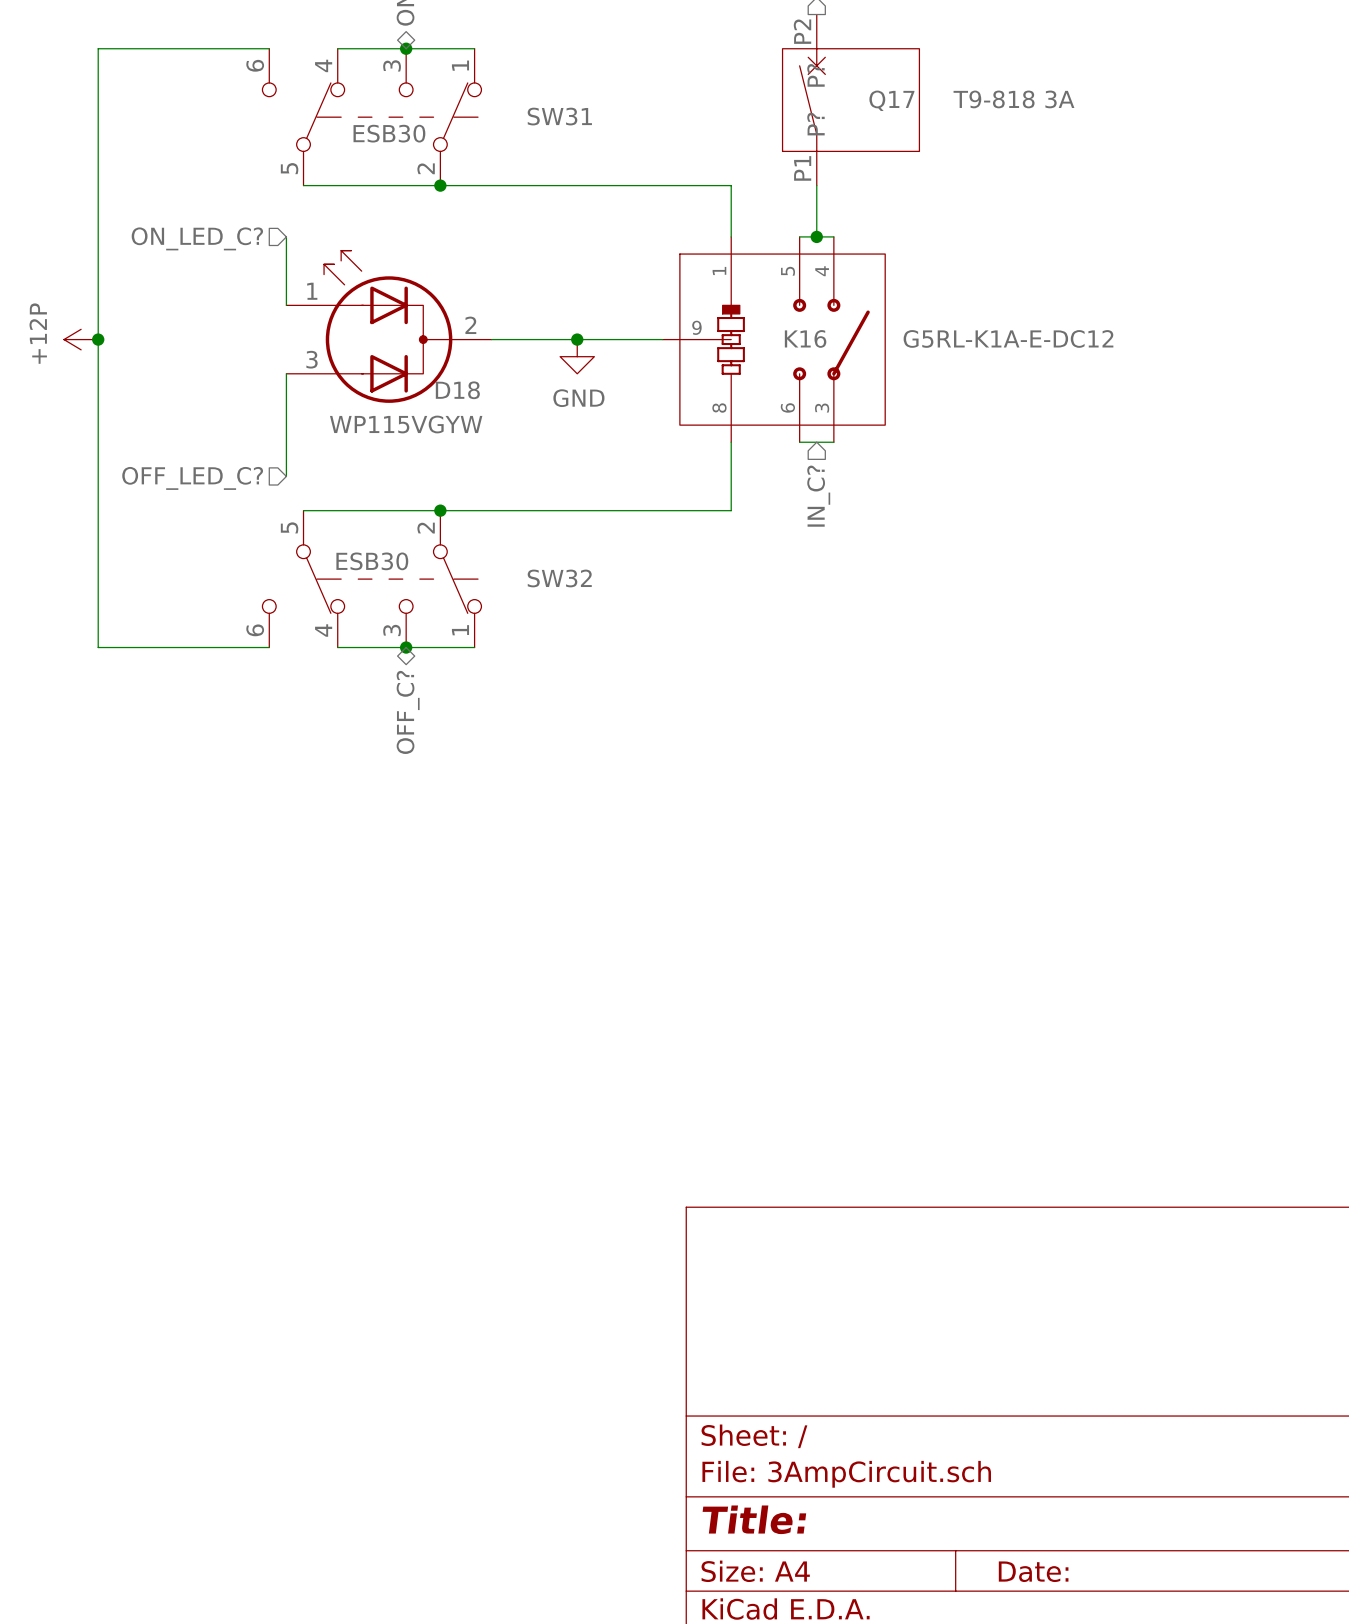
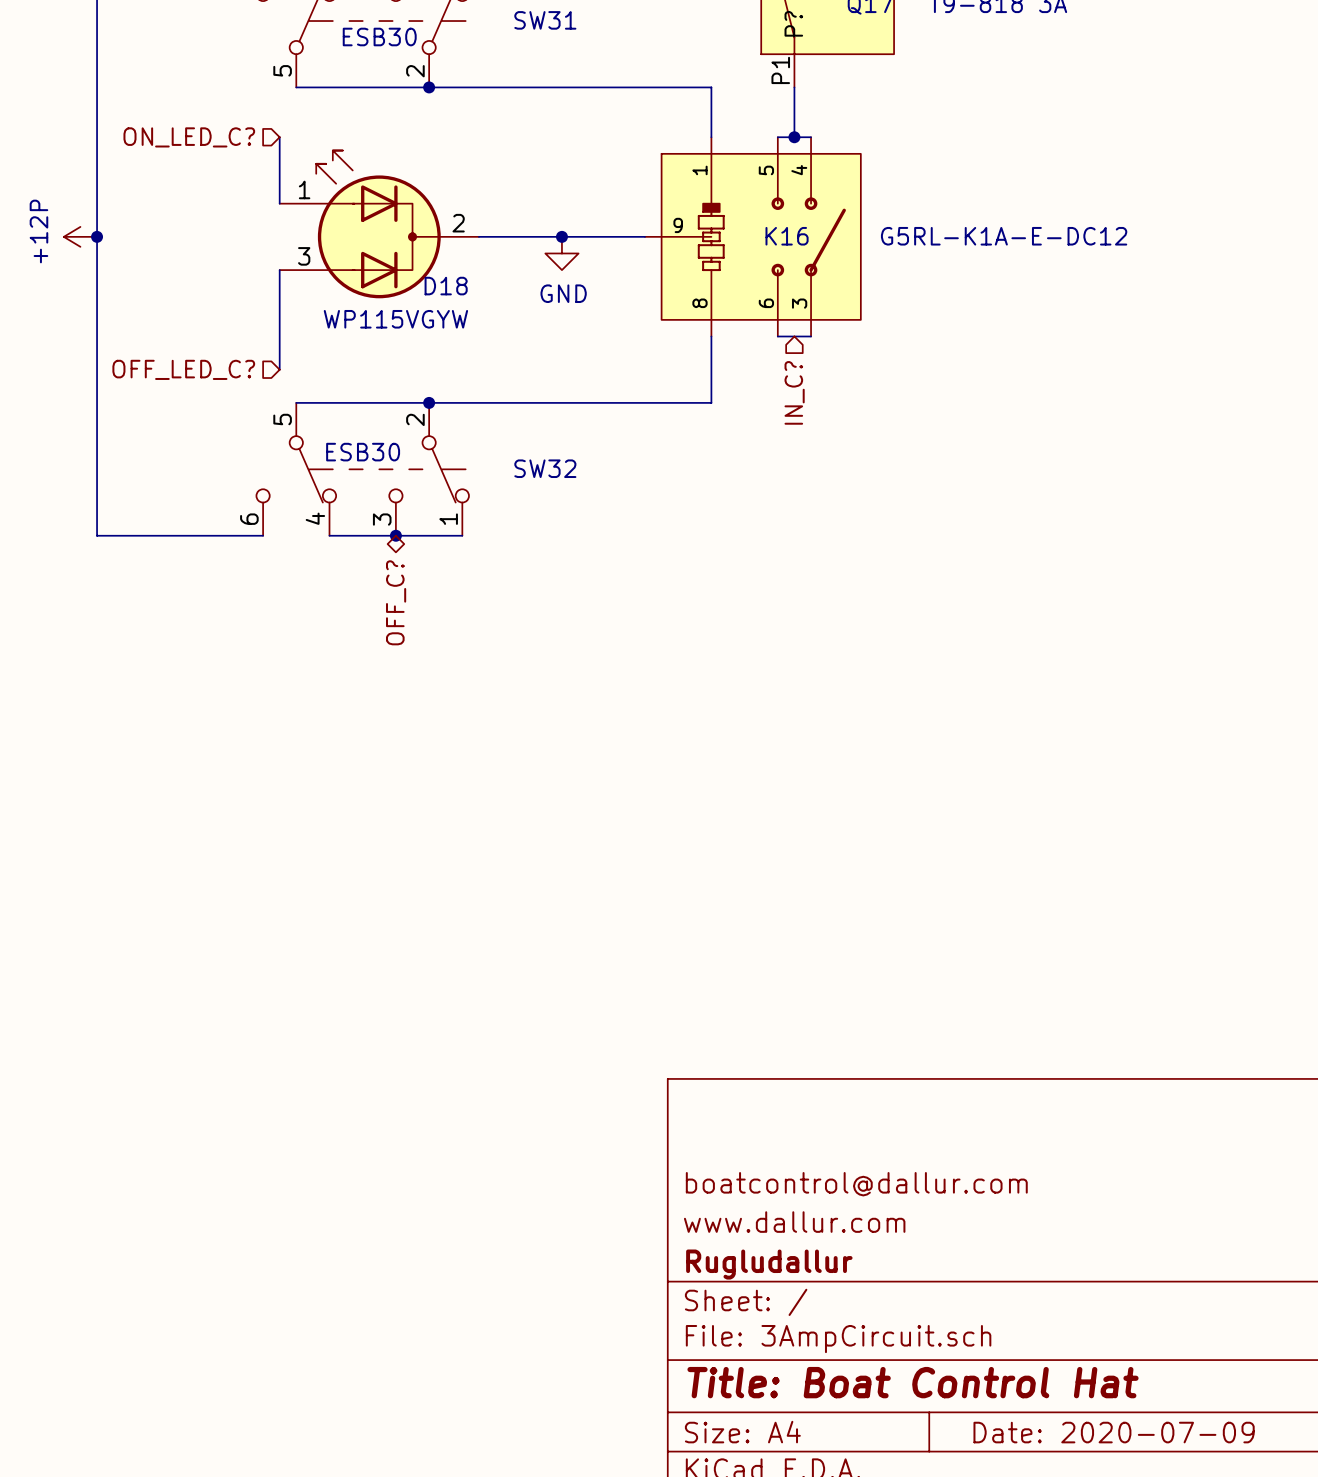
title block: none -> boatcontrol@dallur.com (856, 1184)
title block: none -> www.dallur.com (794, 1222)
title block: none -> Rugludallur (769, 1264)
title block: Title: (754, 1519) -> Title: Boat Control Hat (913, 1382)
title block: Date: (1033, 1571) -> Date: 2020-07-09 (1114, 1432)

